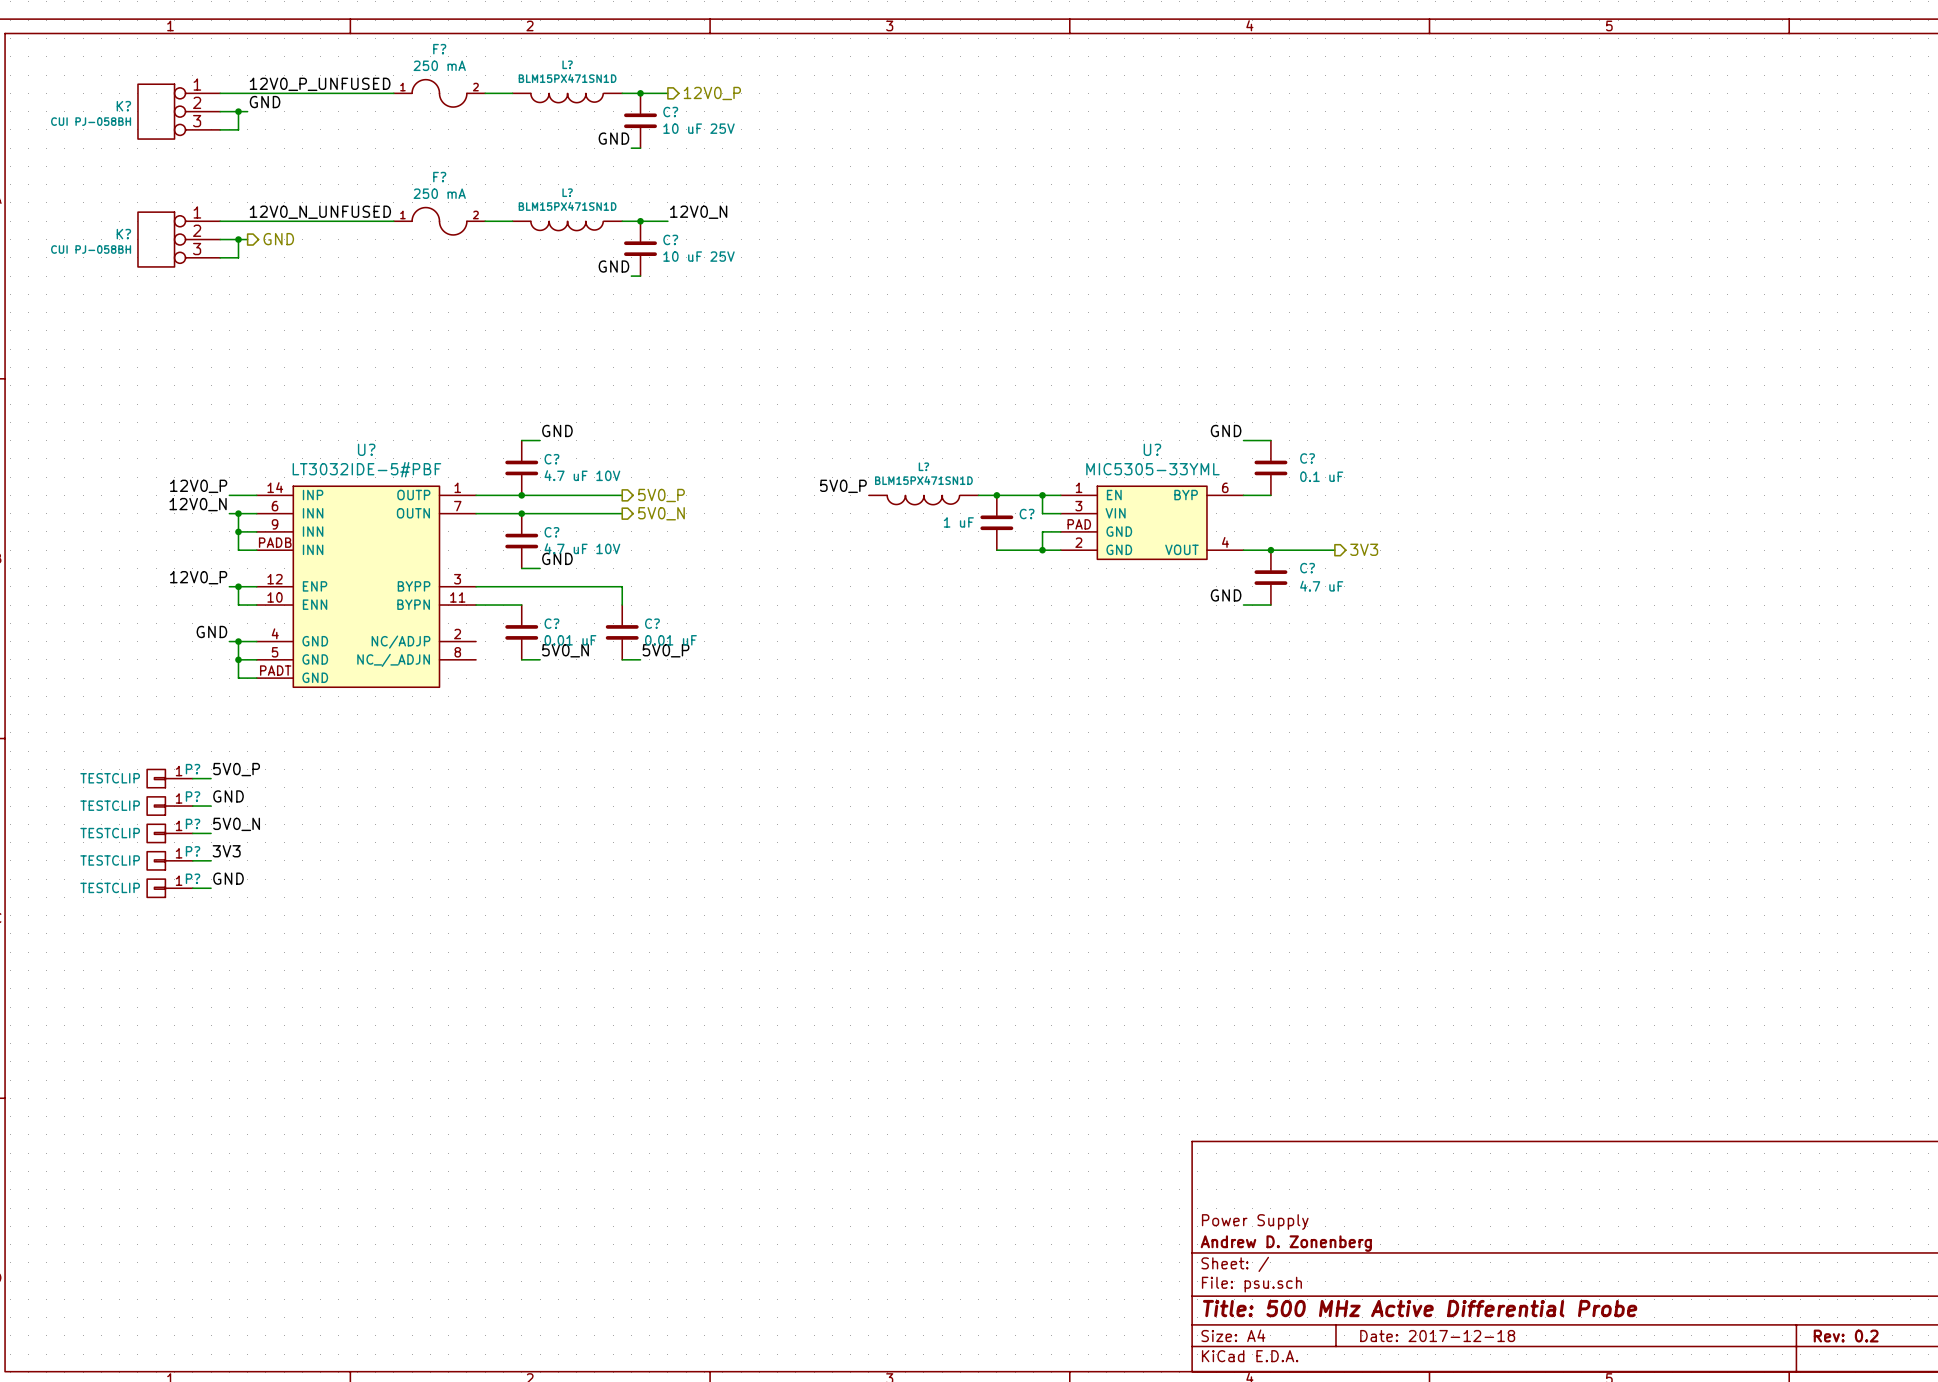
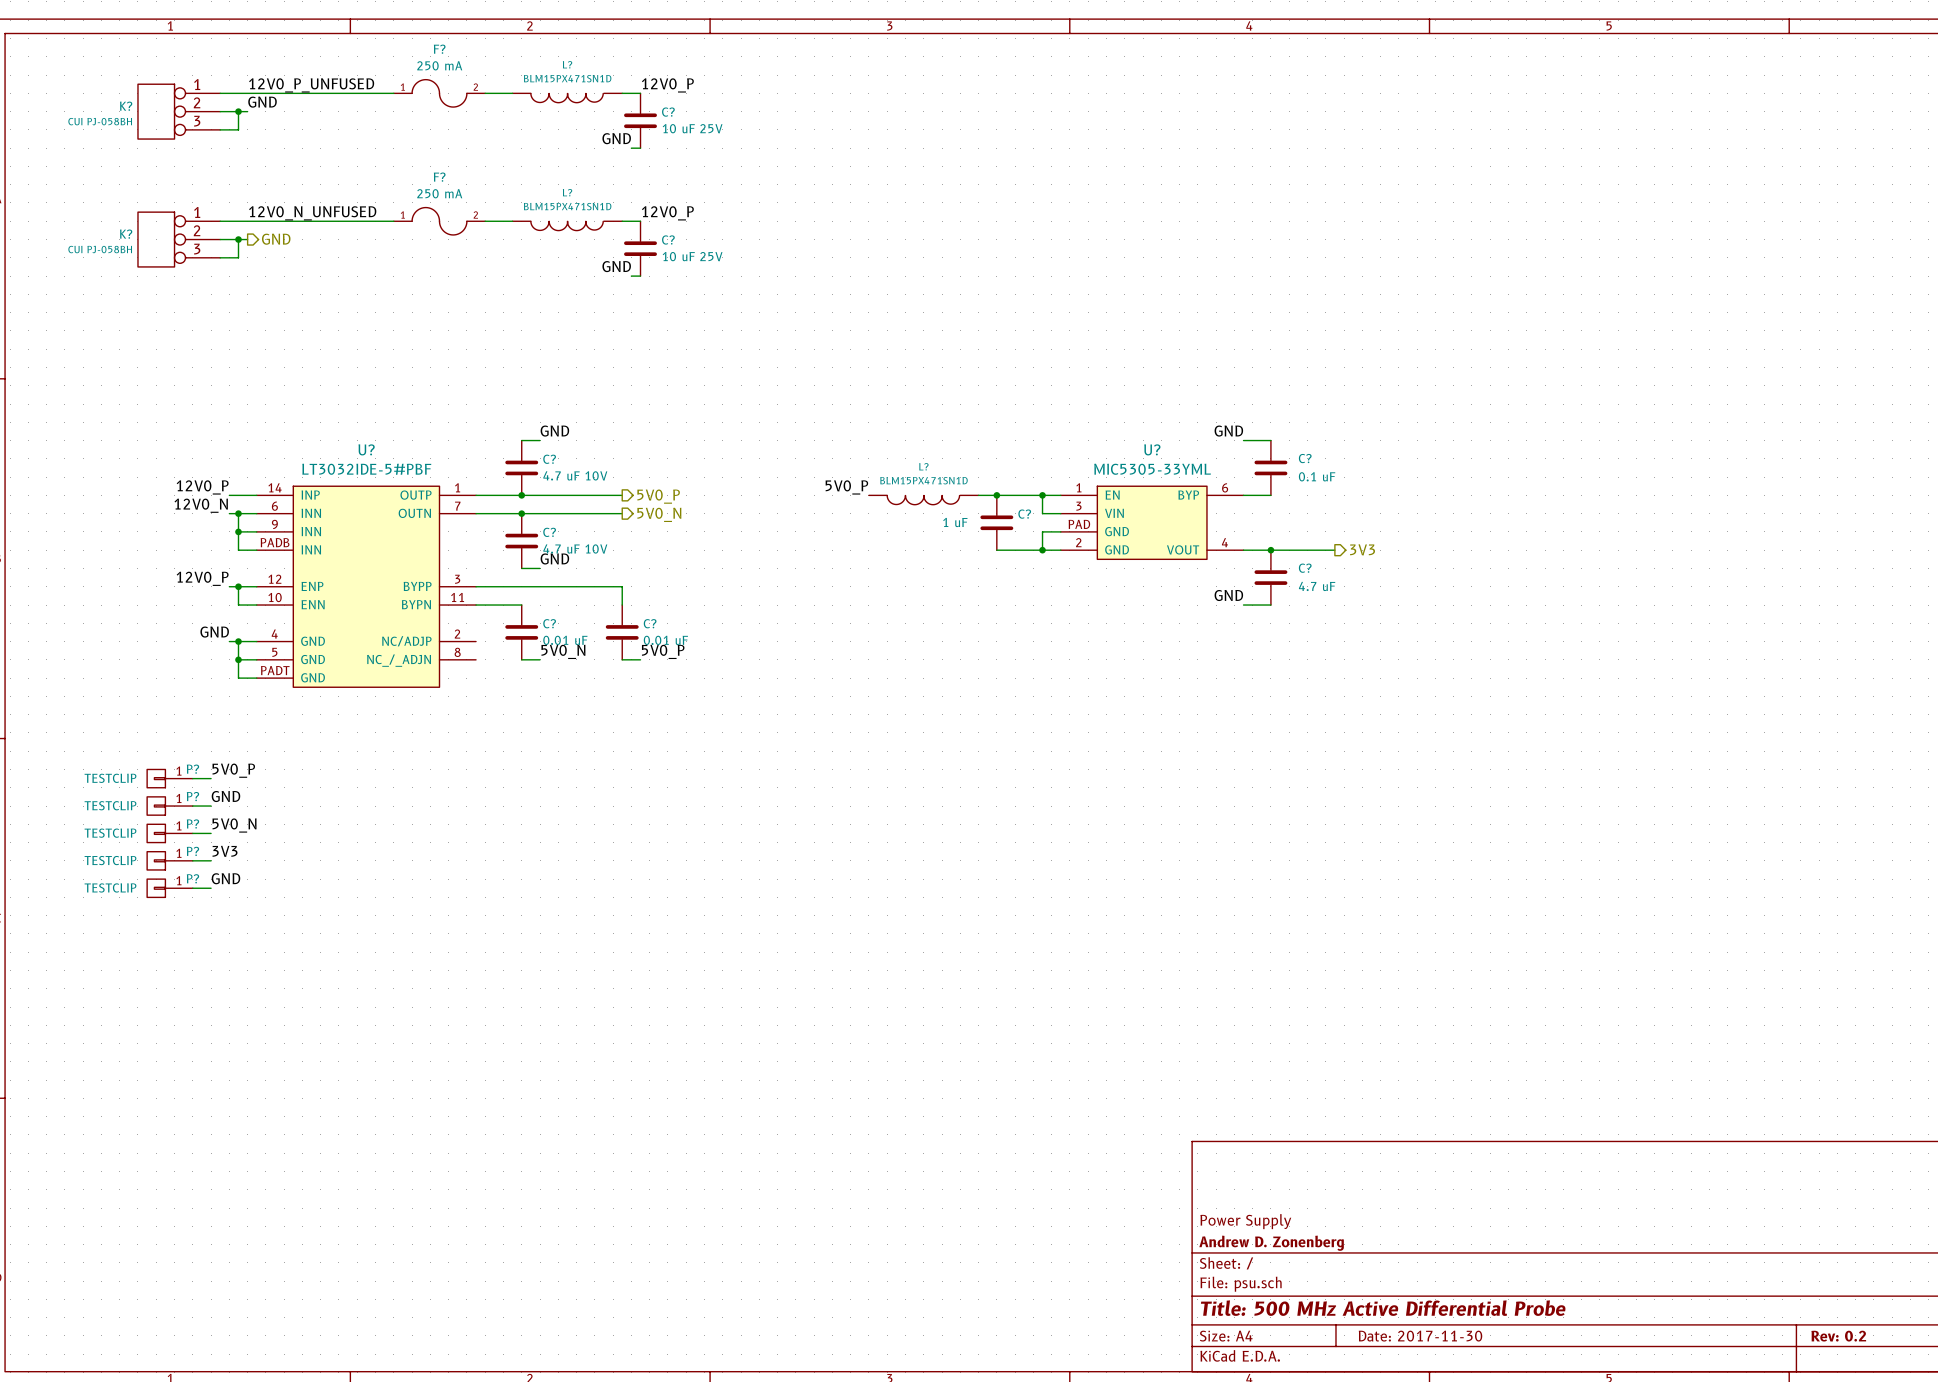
label: none -> 12V0_P (667, 85)
wire: (640, 93) (667, 93) -> none
junction: (640, 93) -> none
hierarchical label: 12V0_P (712, 93) -> none
label: 12V0_N (698, 212) -> 12V0_P (667, 213)
wire: (640, 221) (667, 221) -> none
junction: (640, 221) -> none
title block: Date: 2017-12-18 (1437, 1336) -> Date: 2017-11-30 (1420, 1336)

